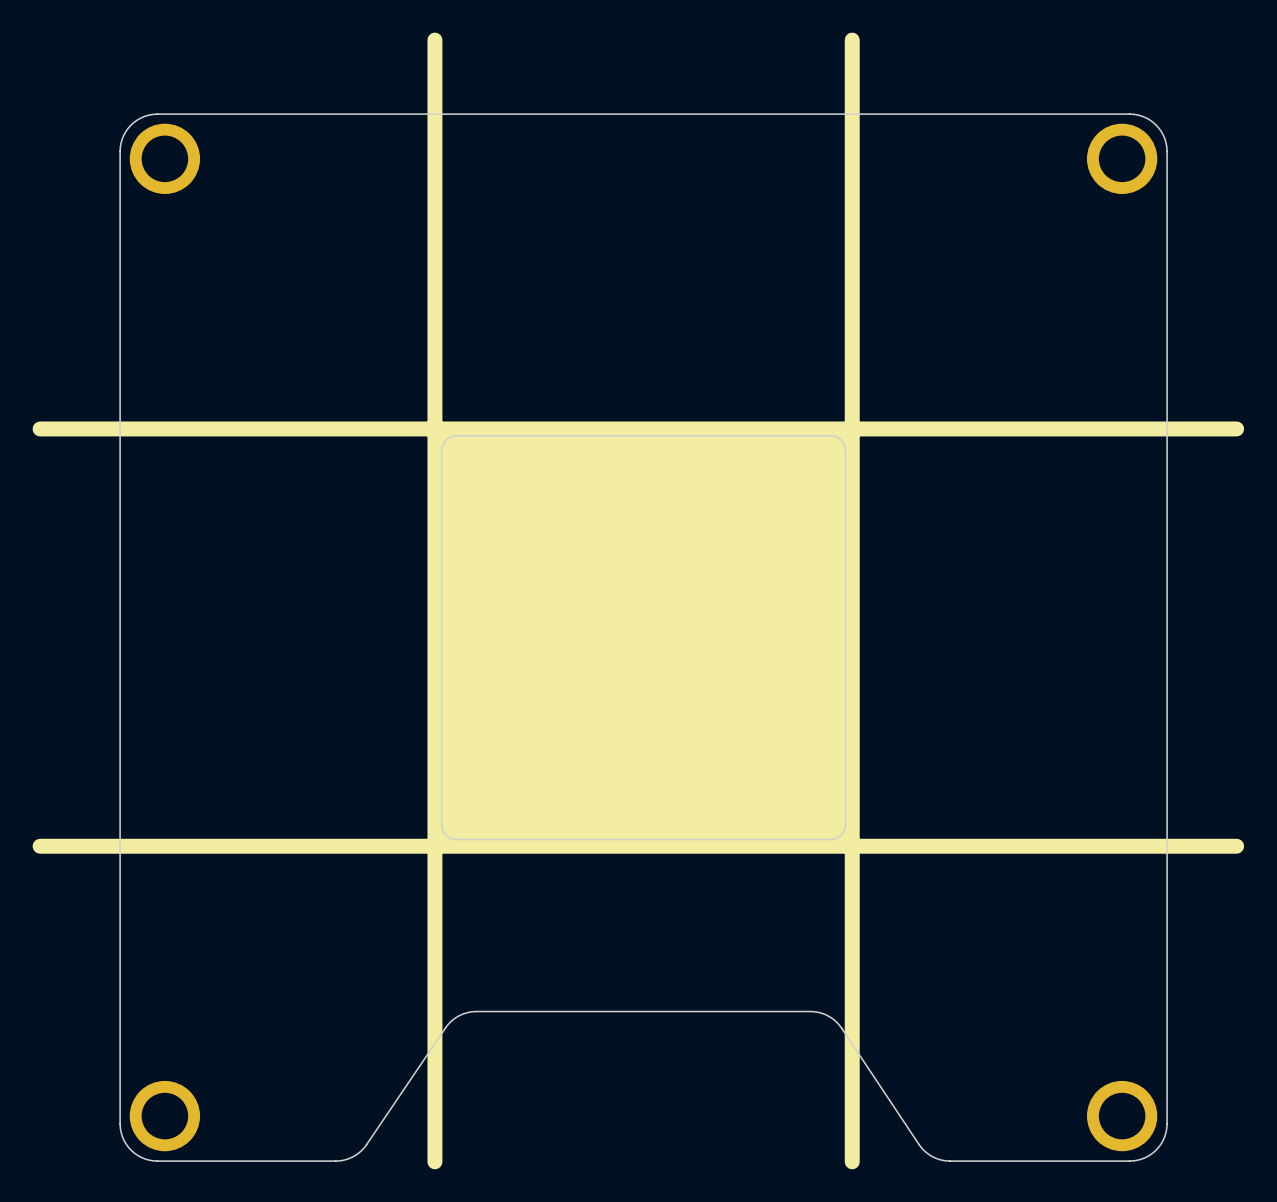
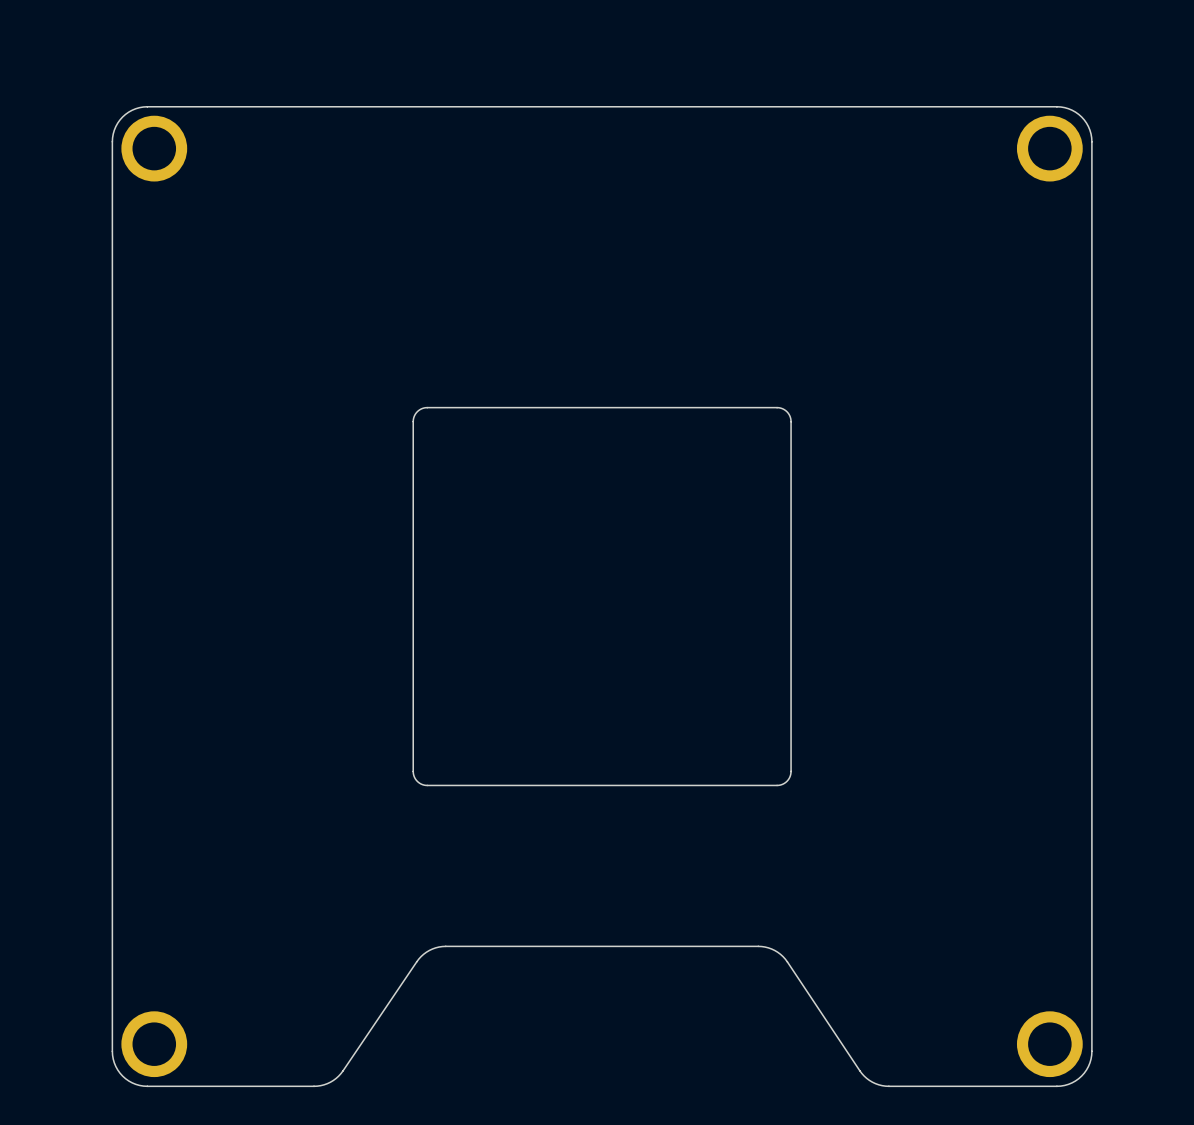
line: (434, 40) (434, 1161) -> none
line: (852, 40) (852, 1161) -> none
line: (40, 428) (1236, 428) -> none
drawing: [438, 428, 849, 844] -> none
line: (40, 846) (1236, 846) -> none

